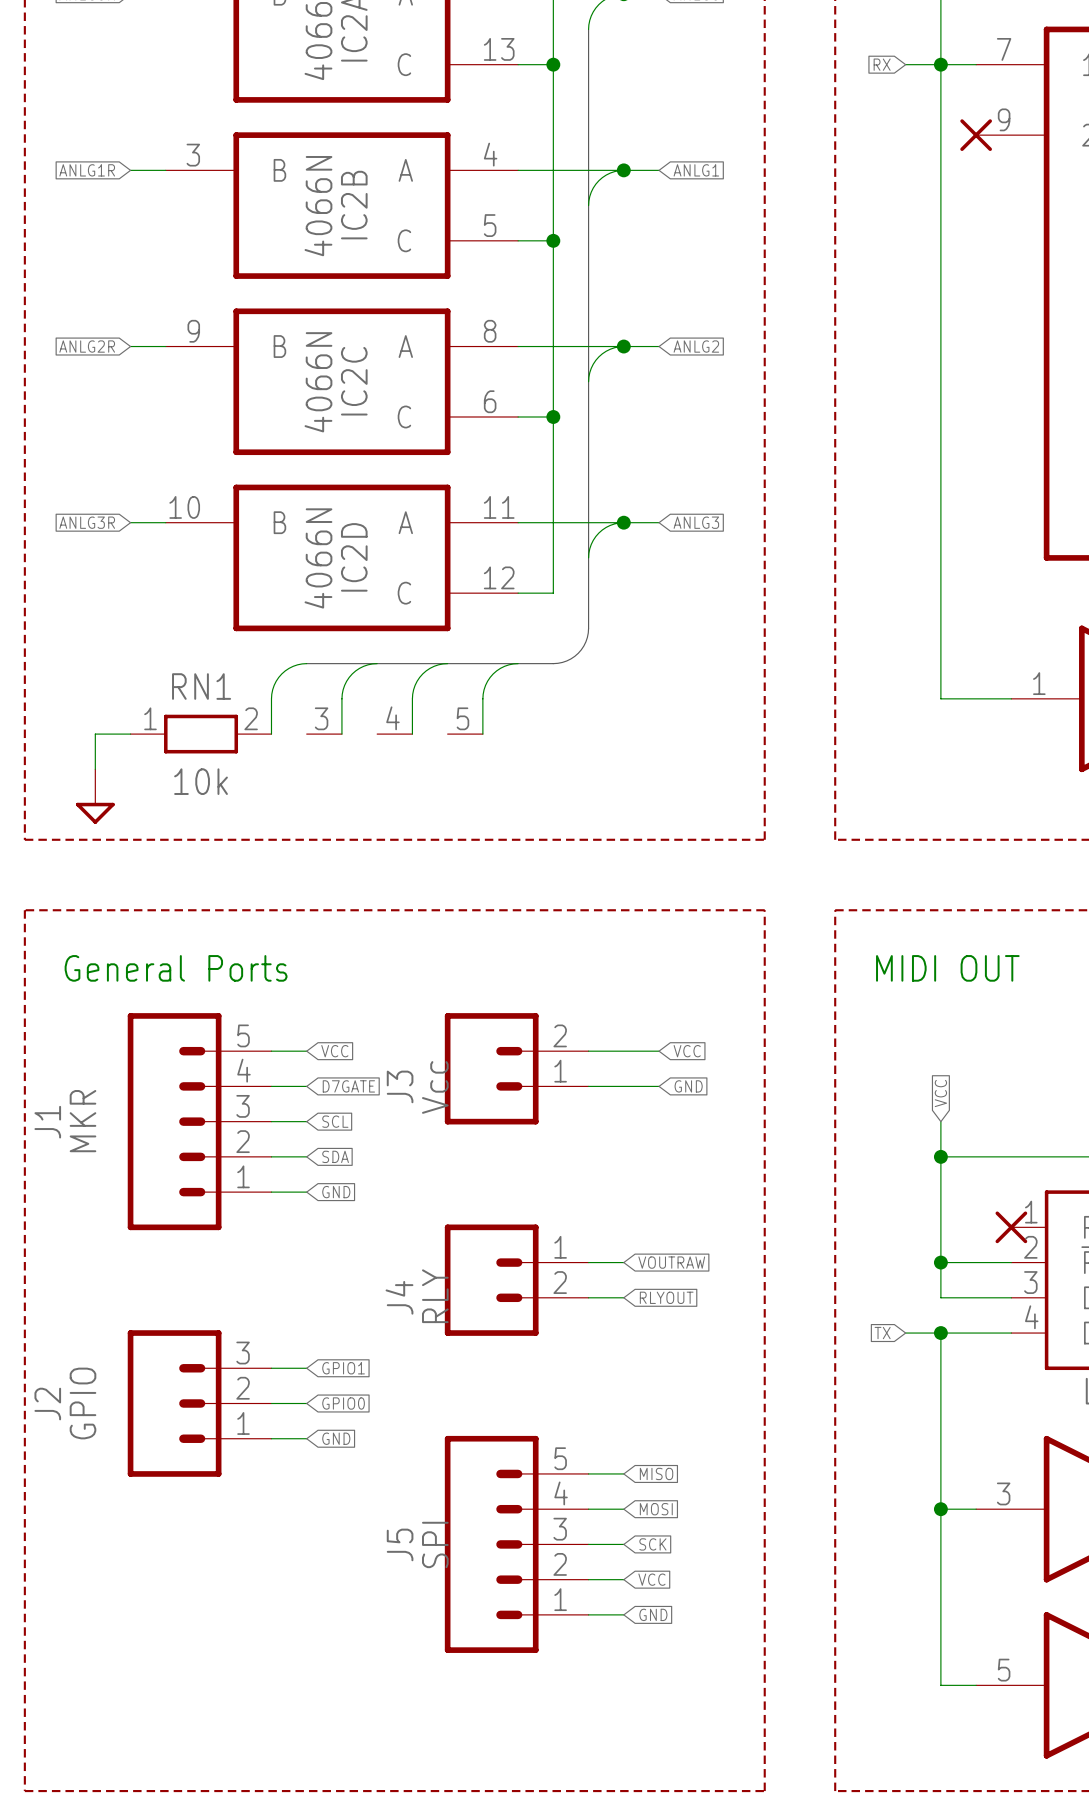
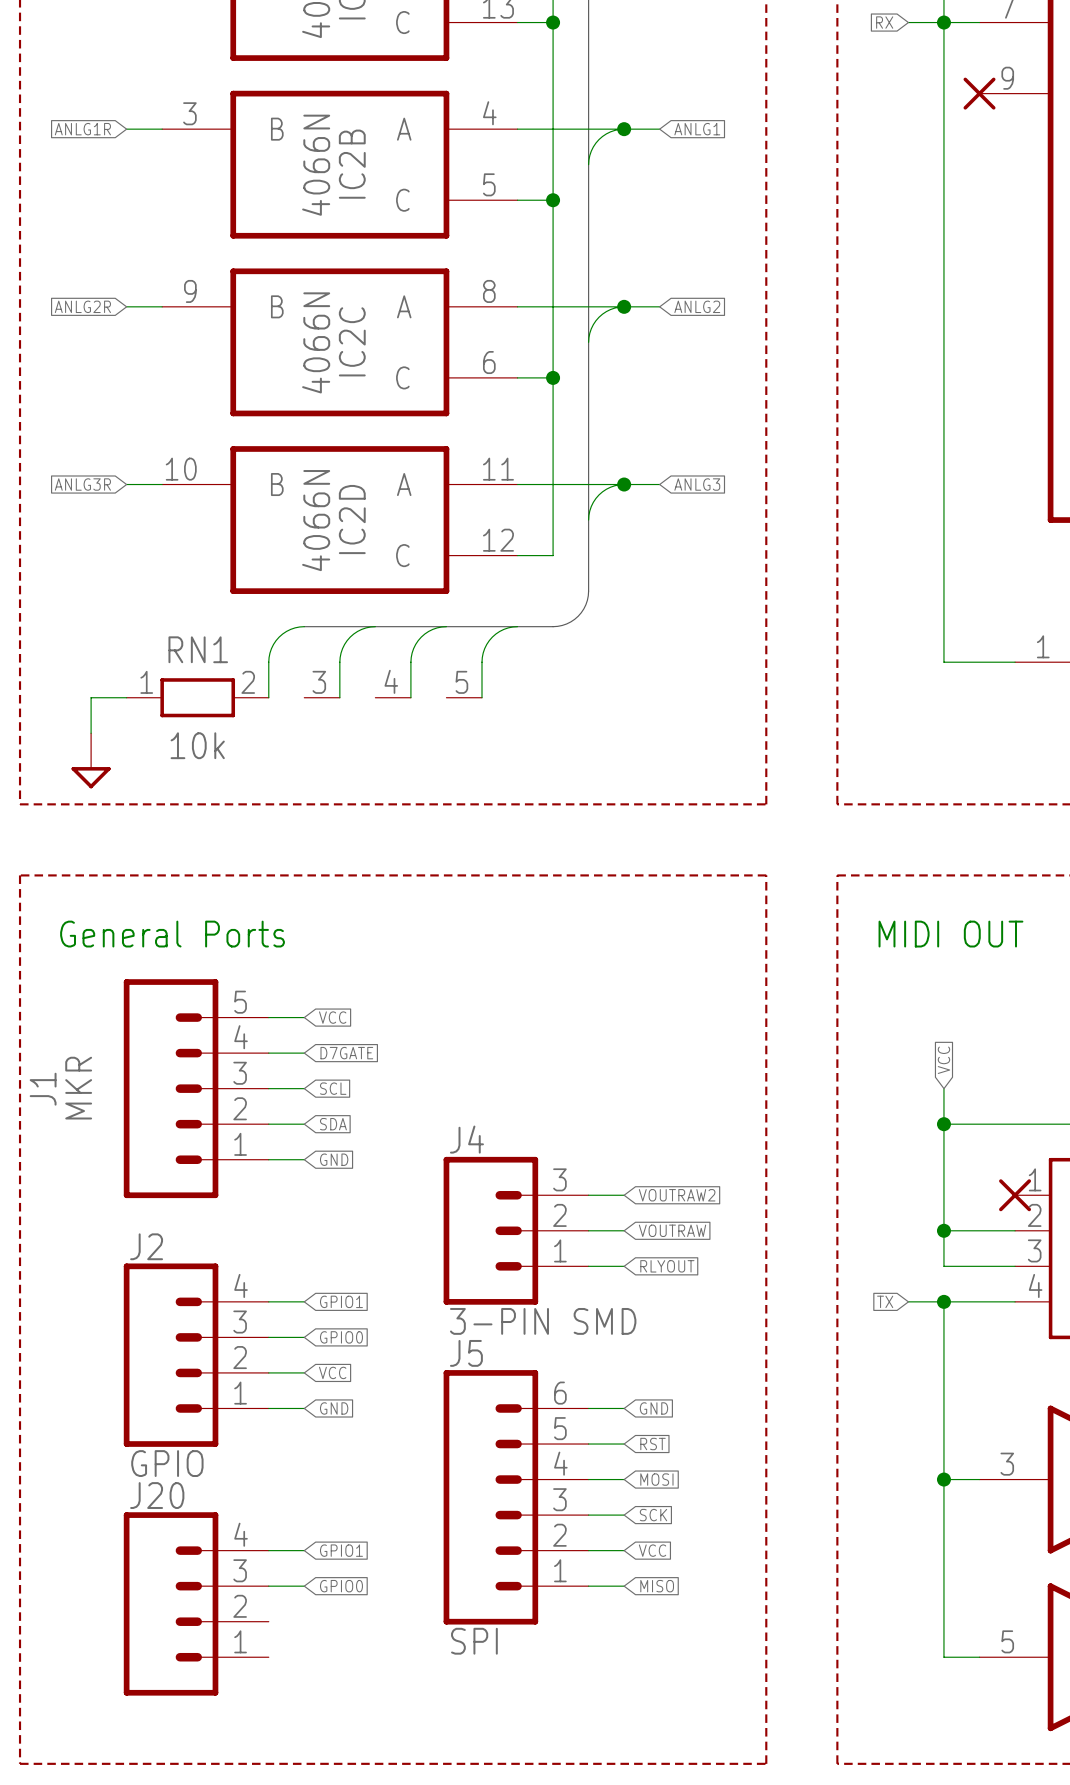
wire: (588, 1051) (659, 1051) -> none
global label: VCC (687, 1051) -> none
J3: Vcc (516, 1068) -> none
wire: (588, 1086) (659, 1086) -> none
global label: GND (688, 1086) -> none
J4 symbol: [444, 1224, 589, 1336] -> [443, 1156, 589, 1305]
wire: none -> (588, 1195) (624, 1195)
global label: none -> VOUTRAW2 (677, 1195)
J4 value: RLY (435, 1296) -> 3-PIN SMD (543, 1321)
J4 name position: J4 (399, 1297) -> J4 (466, 1139)
J2 symbol: [127, 1330, 272, 1477] -> [123, 1263, 269, 1447]
wire: none -> (268, 1301) (304, 1301)
global label: none -> GPIO1 (341, 1301)
global label: GPIO1 (343, 1368) -> GPIO0 (341, 1337)
J2 value position: GPIO (82, 1403) -> GPIO (167, 1463)
global label: GPIO0 (343, 1403) -> VCC (332, 1372)
J2 name position: J2 (47, 1404) -> J2 (146, 1246)
J5 symbol: [444, 1435, 589, 1653] -> [443, 1370, 589, 1625]
wire: none -> (588, 1408) (624, 1408)
global label: none -> GND (653, 1408)
global label: MISO (656, 1473) -> RST (653, 1444)
J5 name position: J5 (400, 1544) -> J5 (466, 1353)
J5 value position: SPI (435, 1544) -> SPI (474, 1641)
wire: none -> (268, 1550) (304, 1550)
global label: none -> GPIO1 (341, 1550)
wire: none -> (268, 1586) (304, 1586)
global label: none -> GPIO0 (341, 1586)
global label: GND (653, 1614) -> MISO (657, 1586)
J20: none -> (196, 1603)

